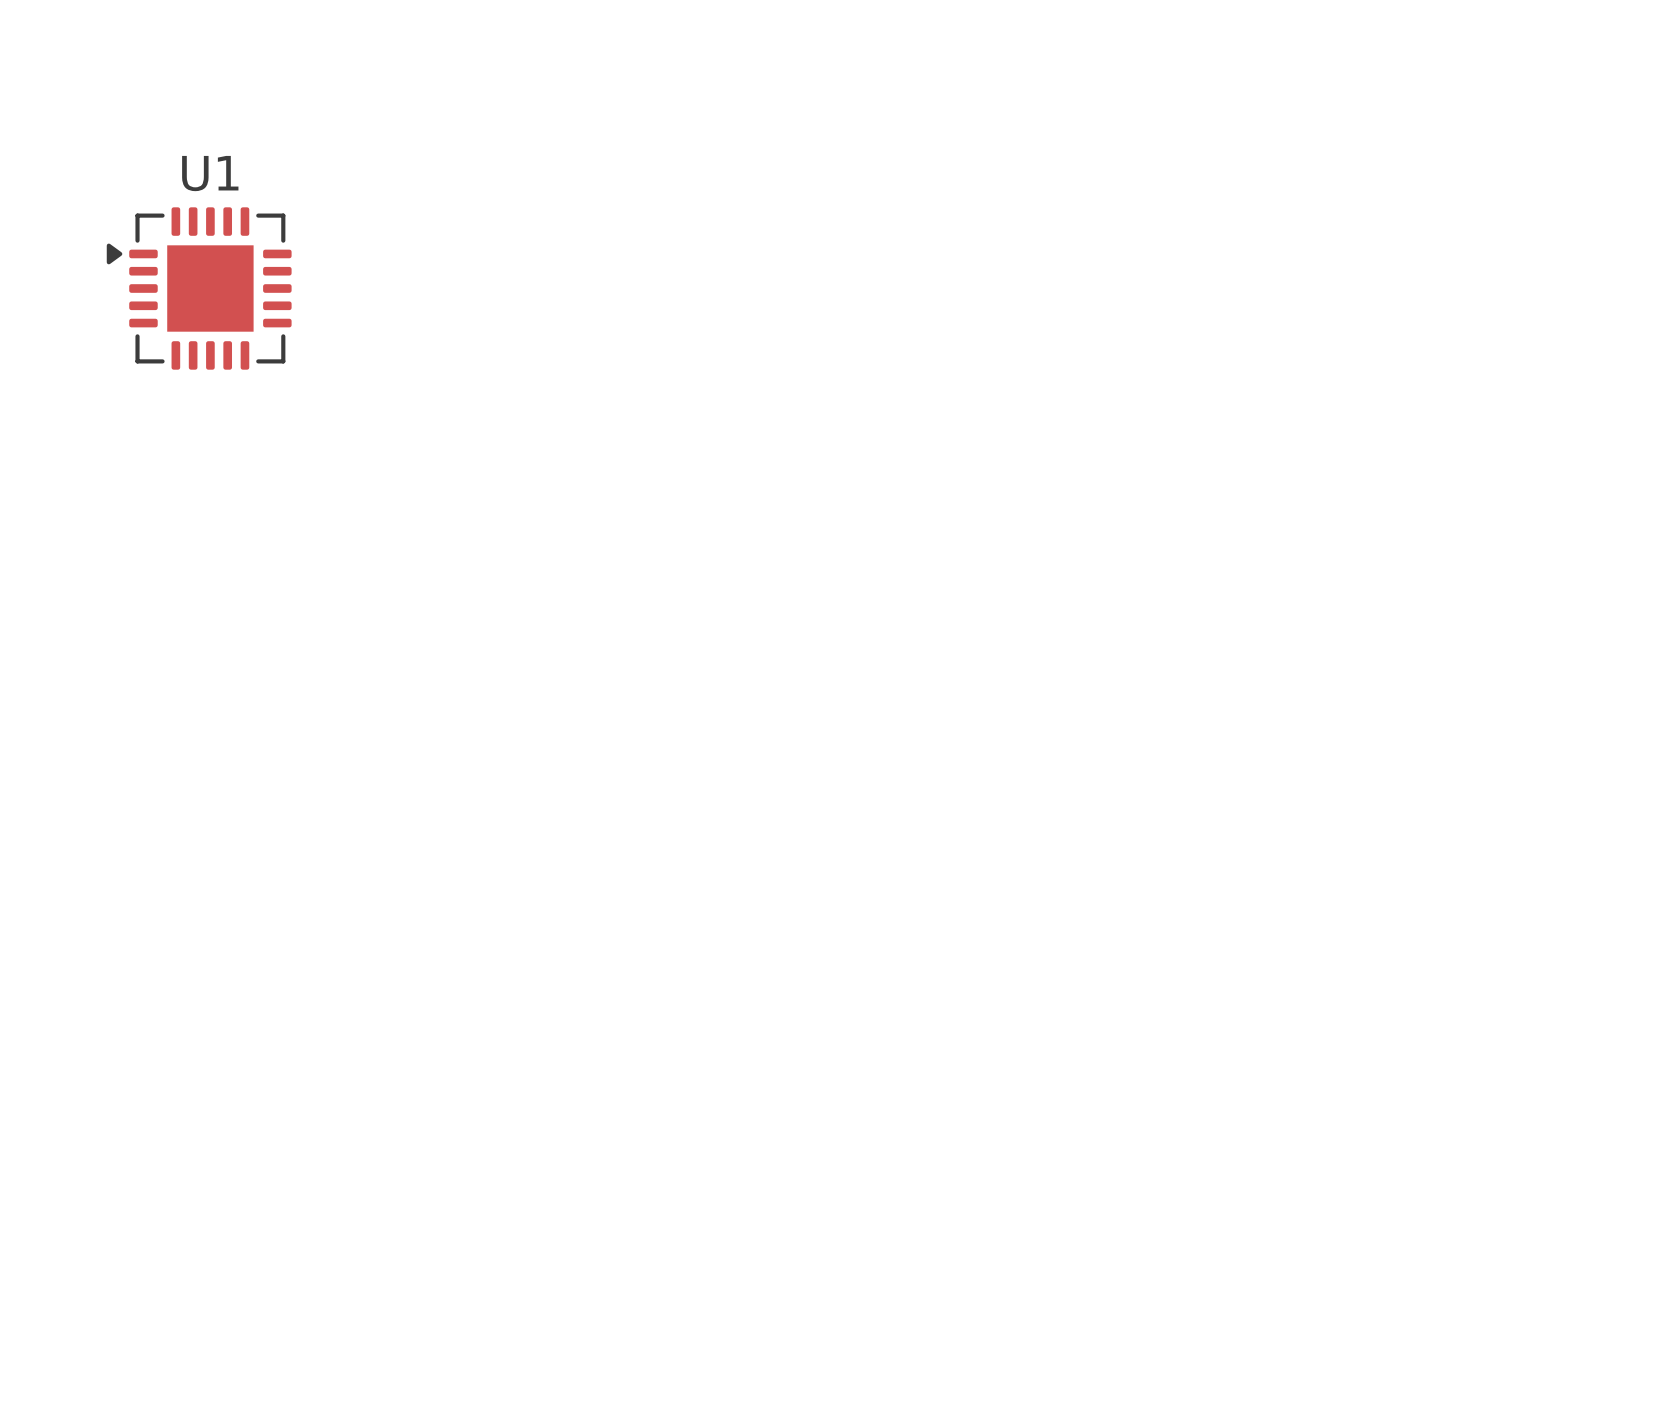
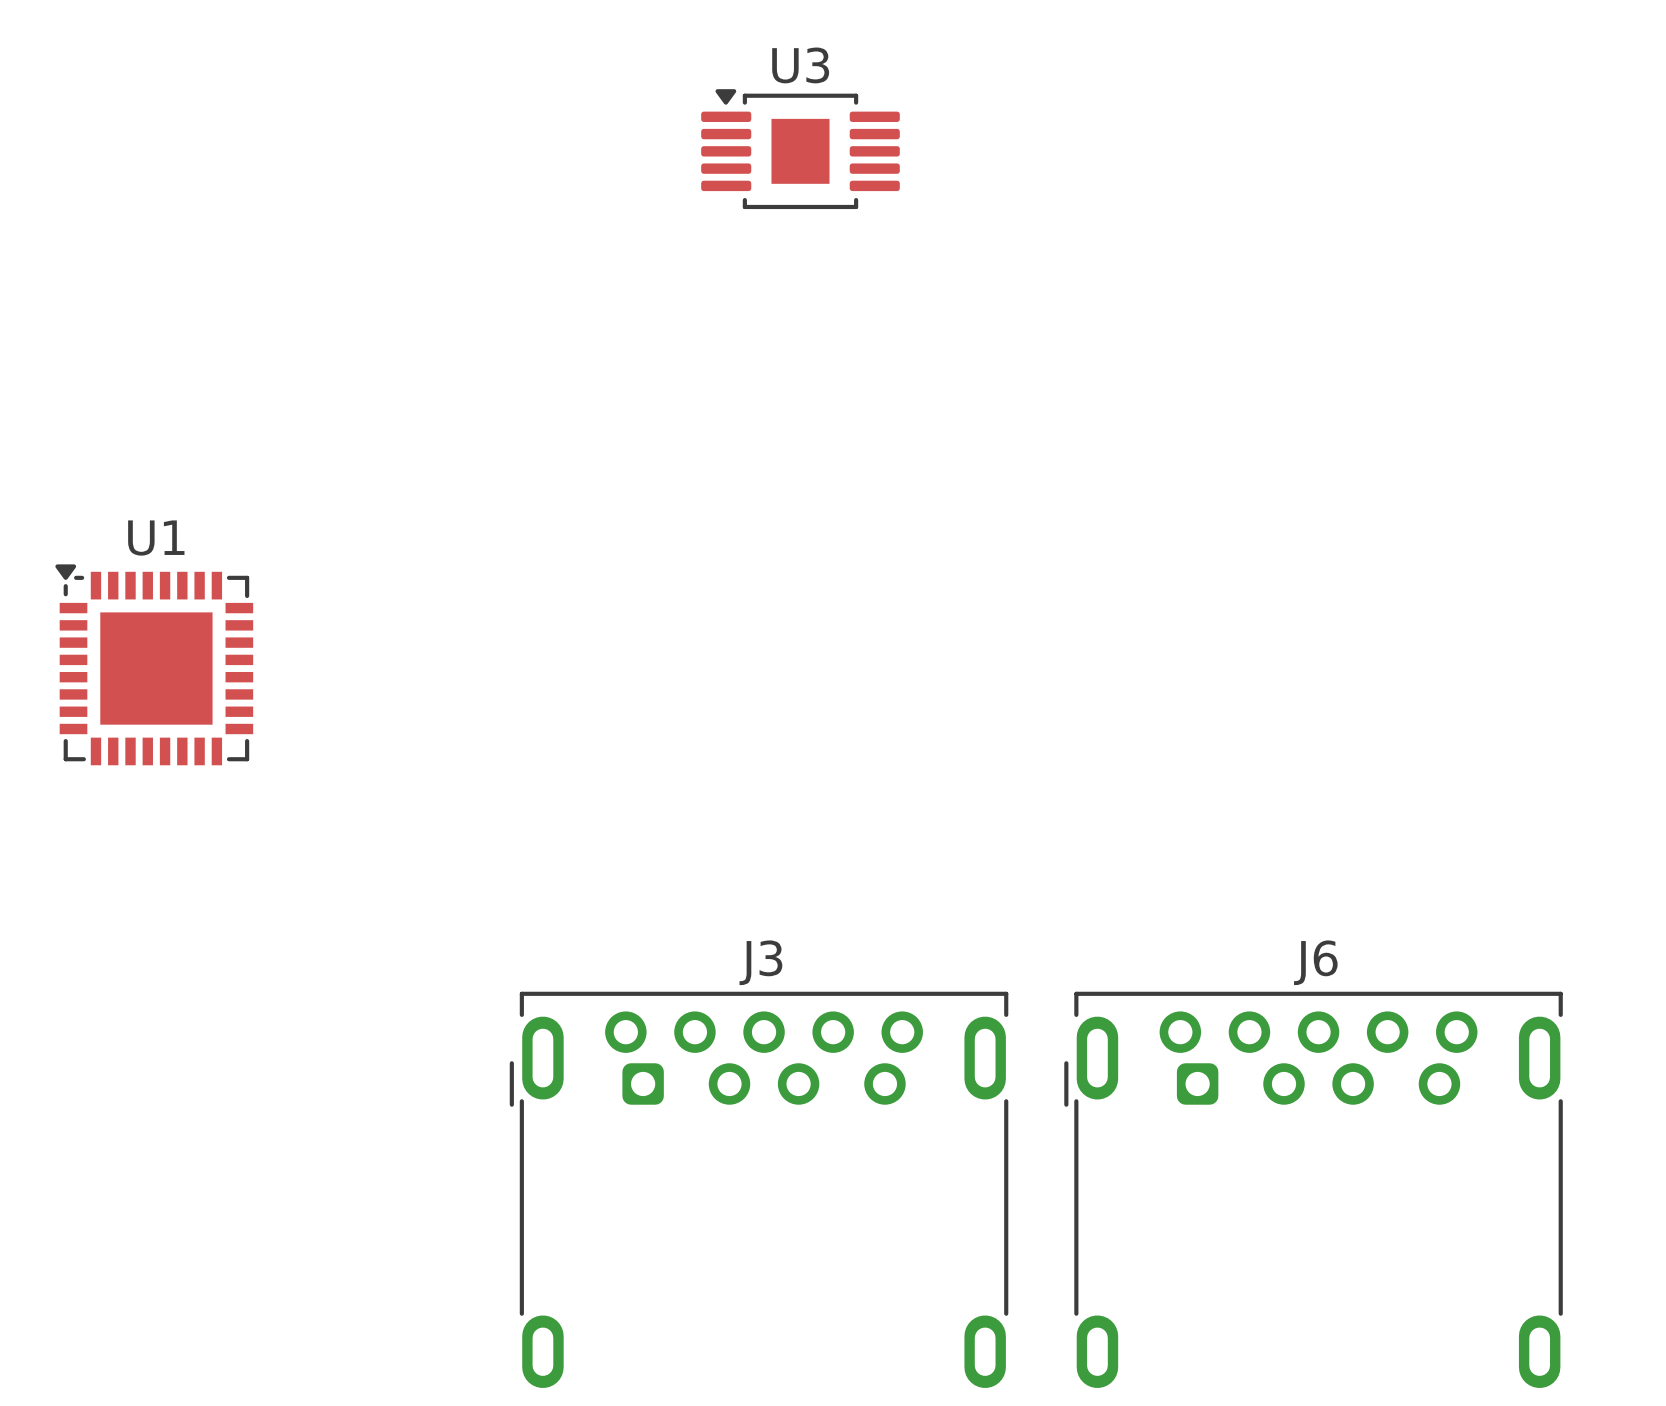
U3: none -> (800, 149)
U1 footprint: [106, 207, 292, 370] -> [55, 564, 254, 766]
J3: none -> (759, 1189)
J6: none -> (1313, 1189)

